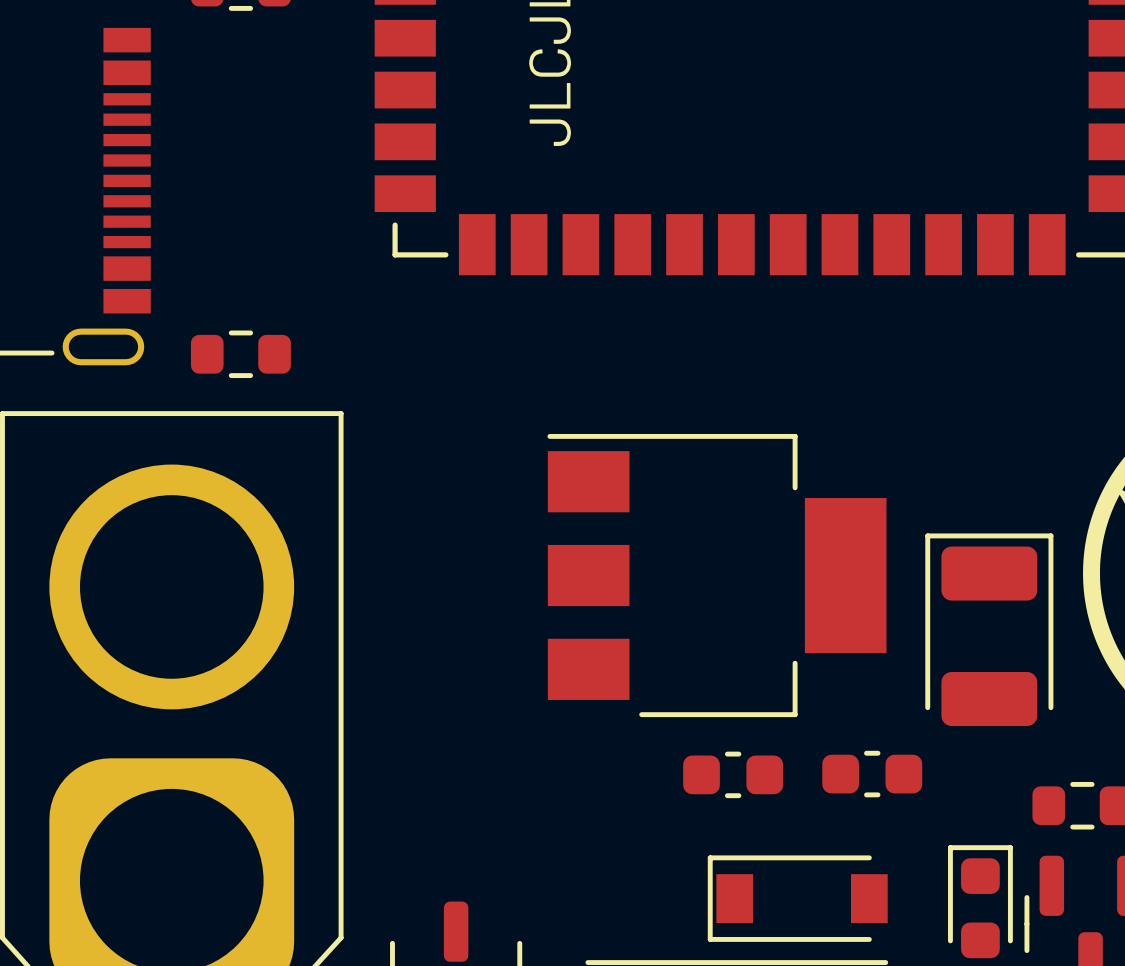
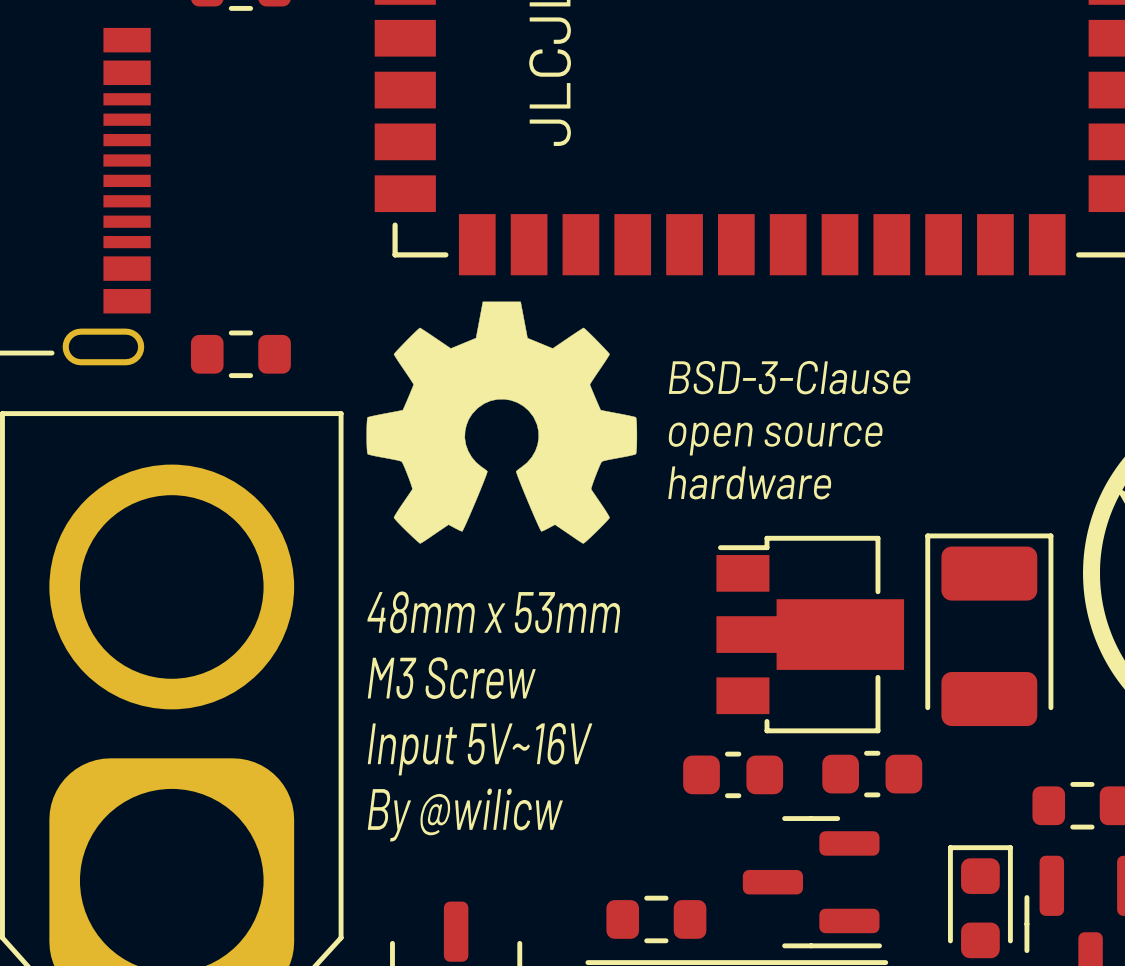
drawing: none -> [366, 301, 638, 544]
text: none -> BSD-3-Clause (789, 377)
text: none -> open source (775, 439)
text: none -> hardware (749, 482)
part: (716, 575) -> none
text: none -> 48mm x 53mm (493, 612)
part: none -> (810, 634)
text: none -> M3 Screw (451, 678)
text: none -> Input 5V~16V (480, 749)
text: none -> By @wilicw (465, 815)
part footprint: [707, 855, 888, 942] -> [742, 816, 882, 949]
part: none -> (656, 919)

